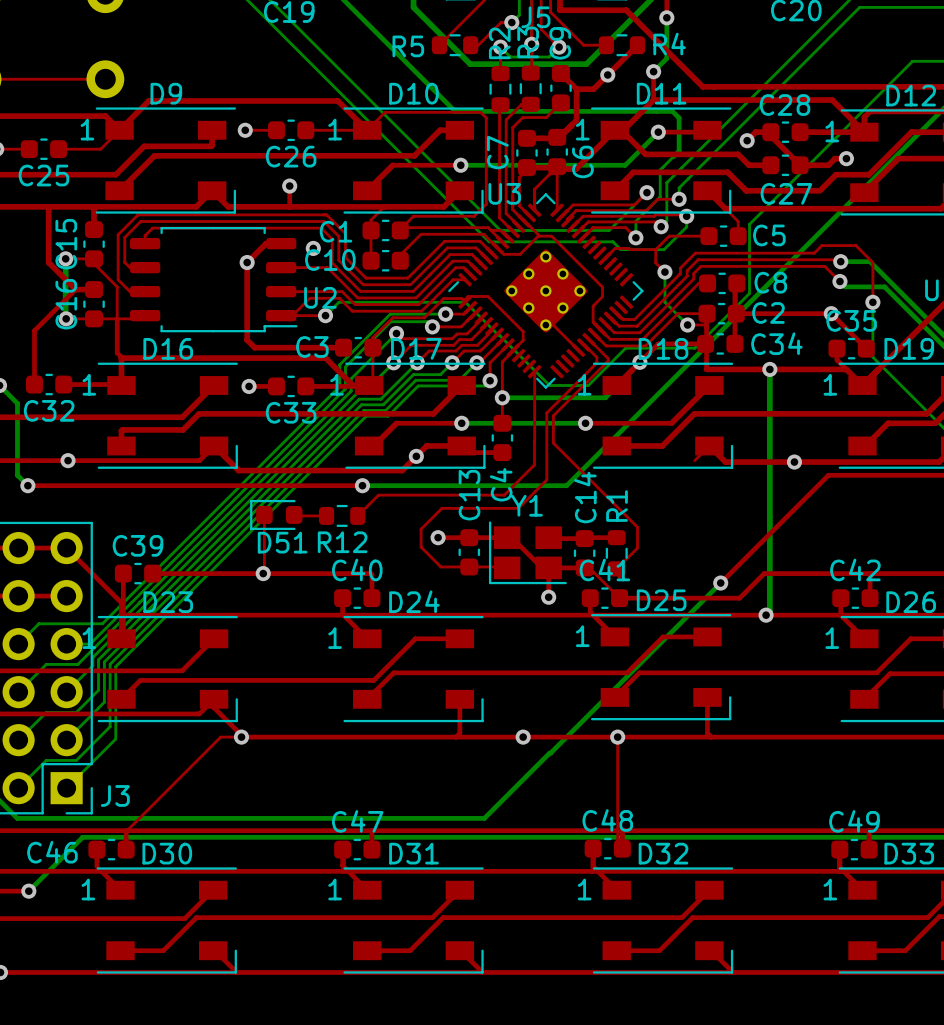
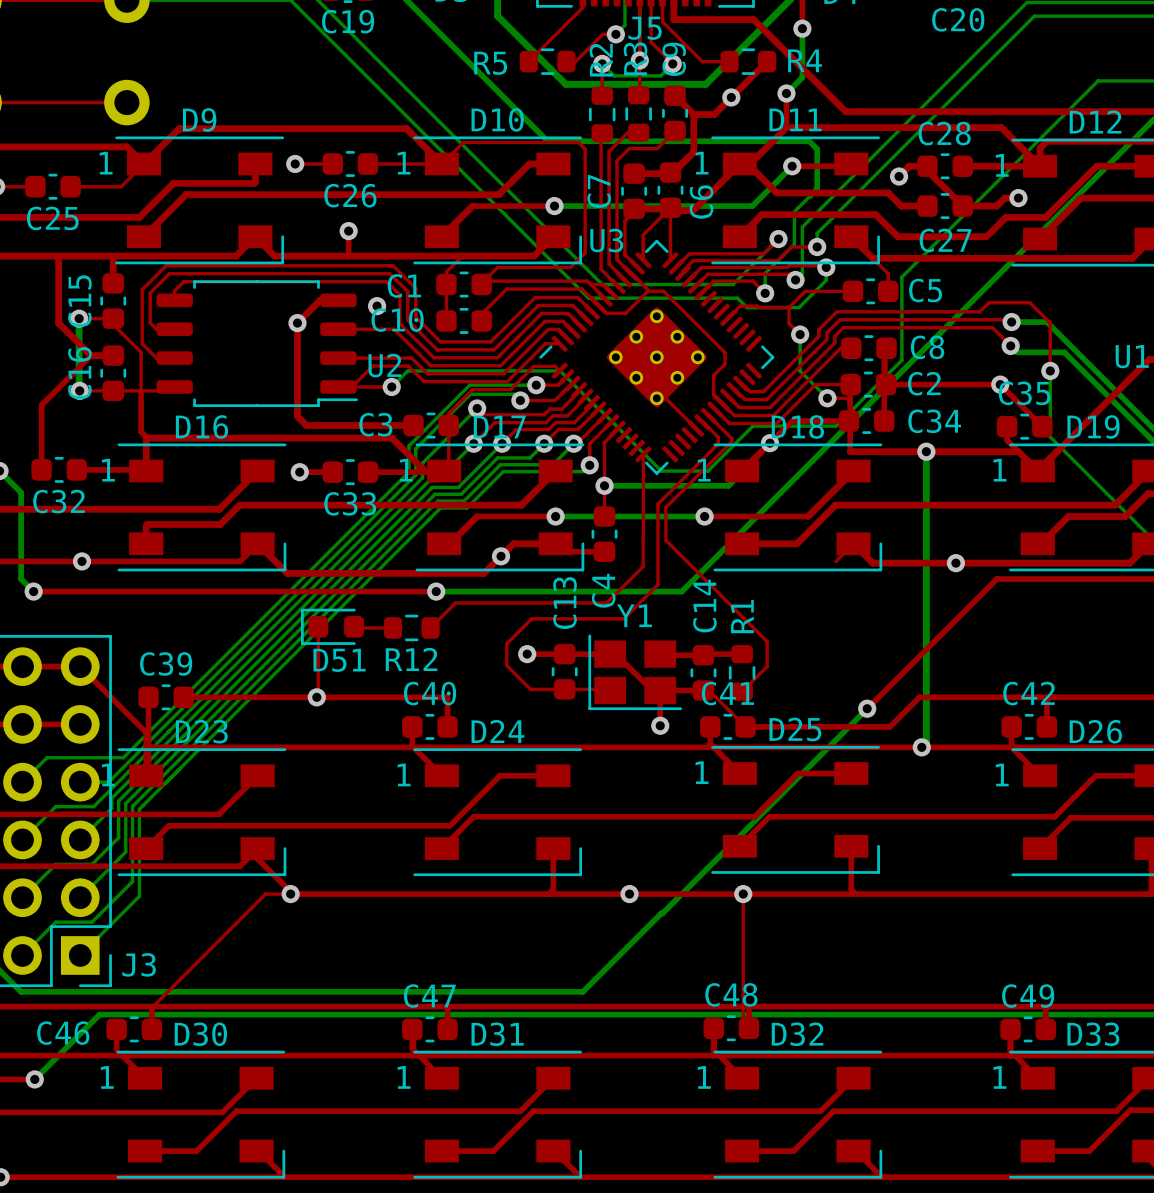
top track: (465, 302) (468, 296) (488, 296) (523, 331) (523, 340) (513, 350) -> none

